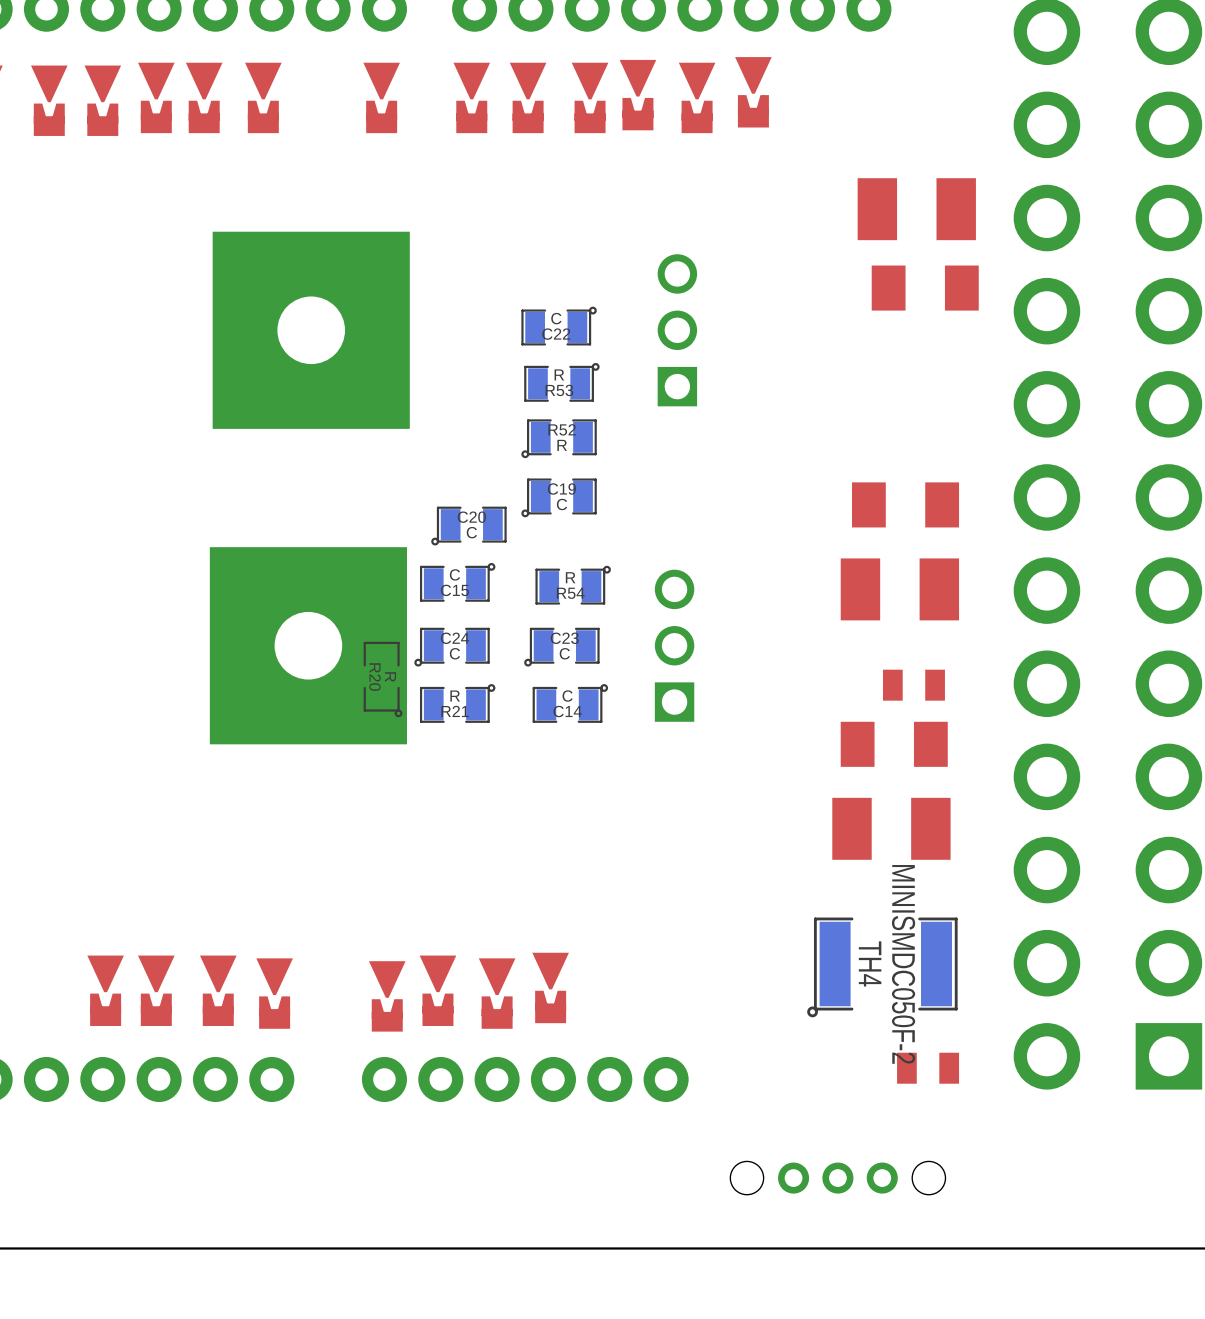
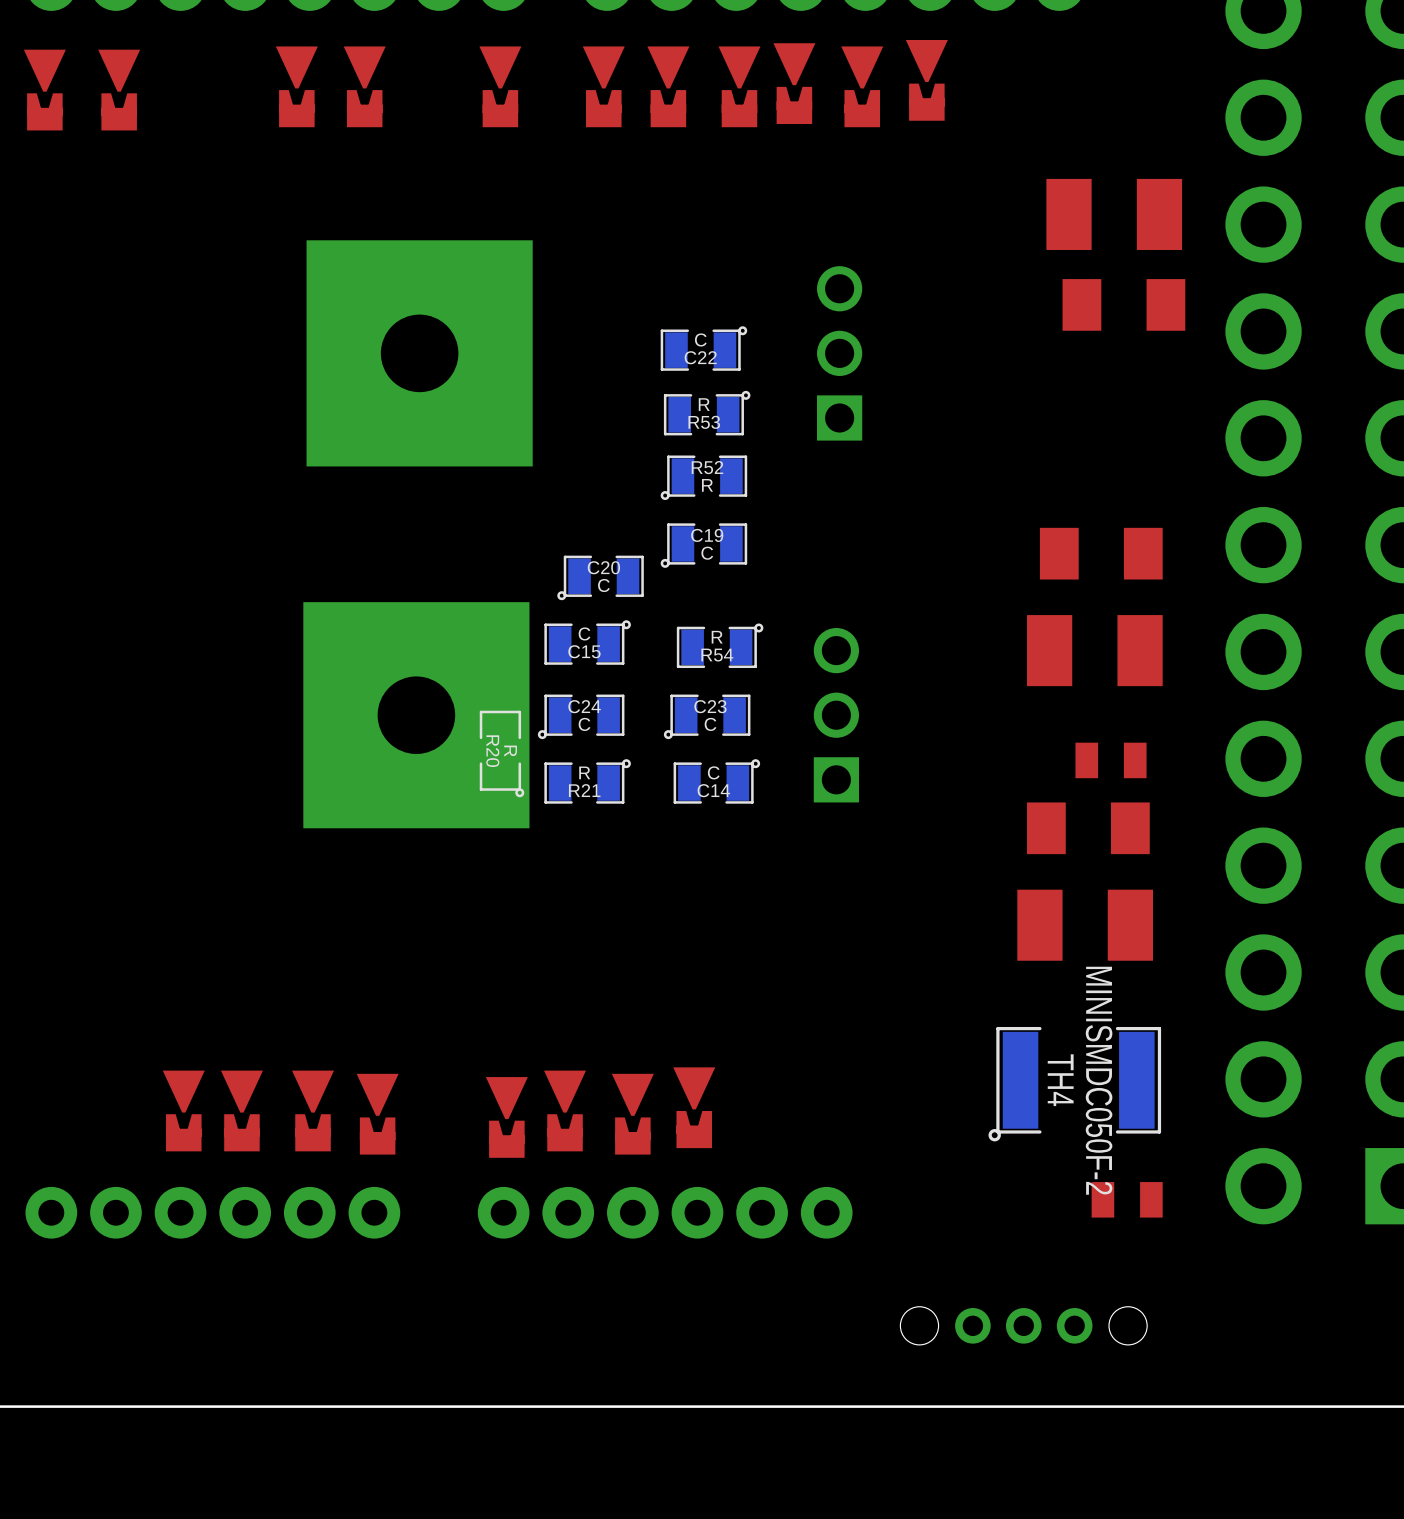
part: (156, 97) -> none
part: (102, 100) -> none

